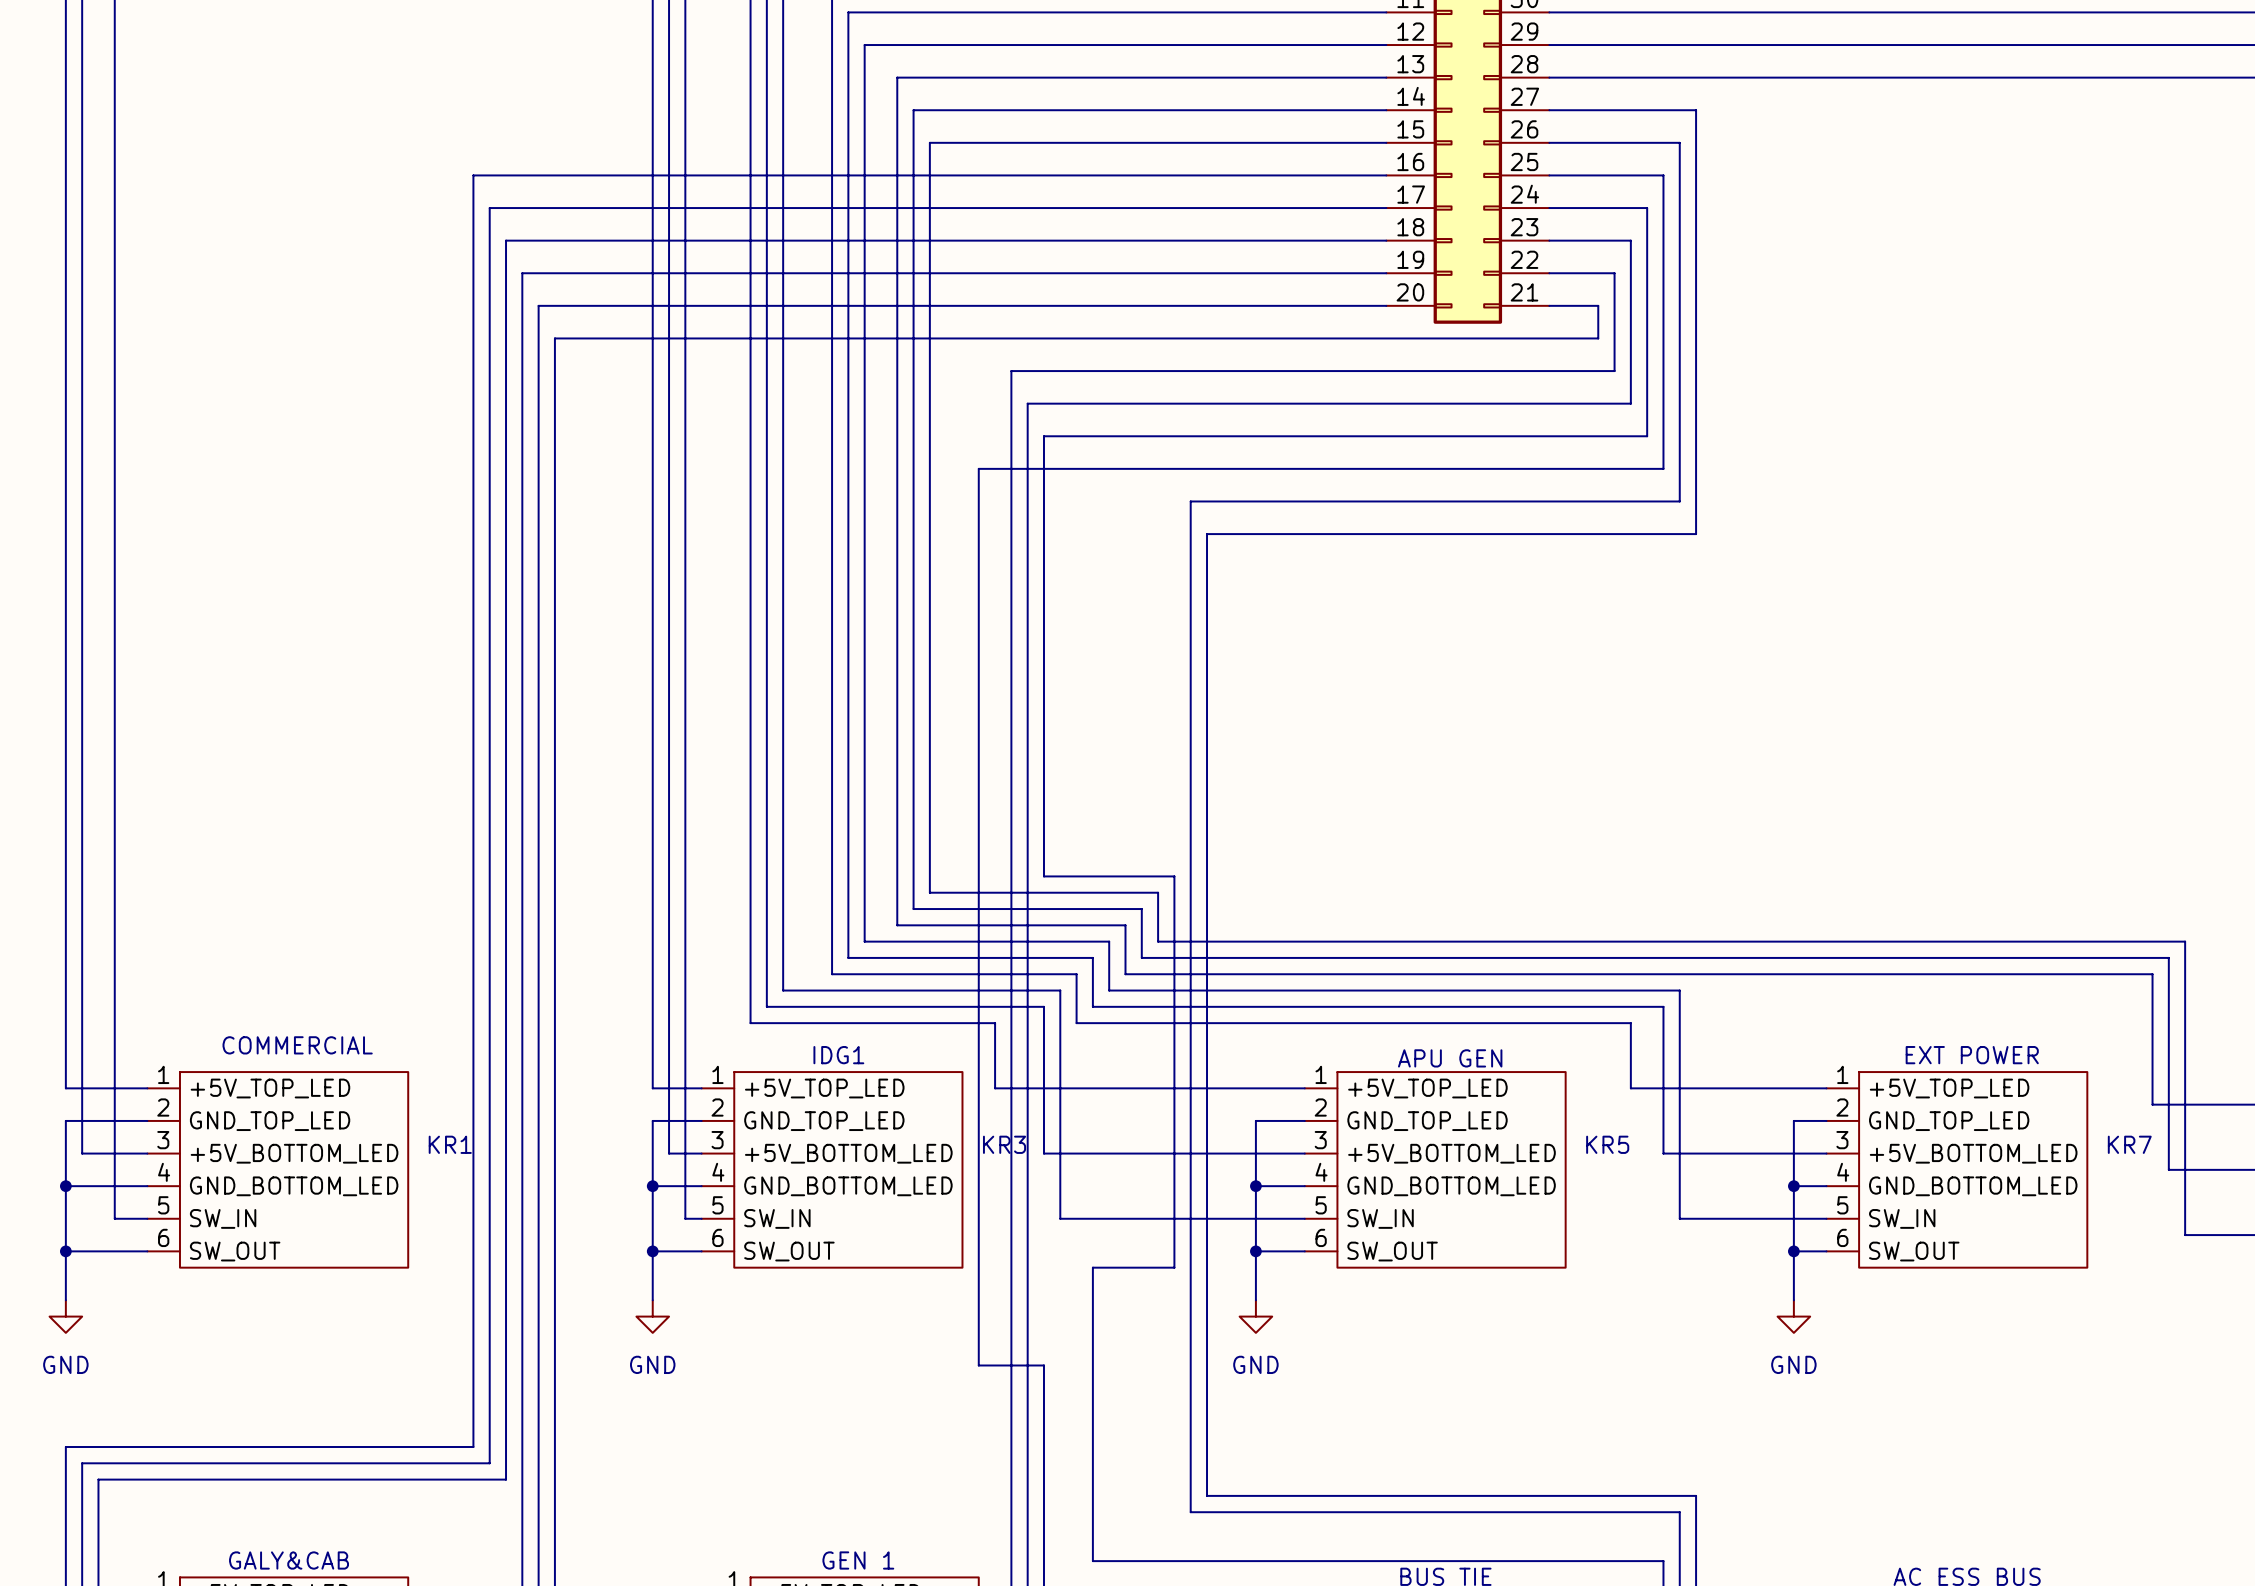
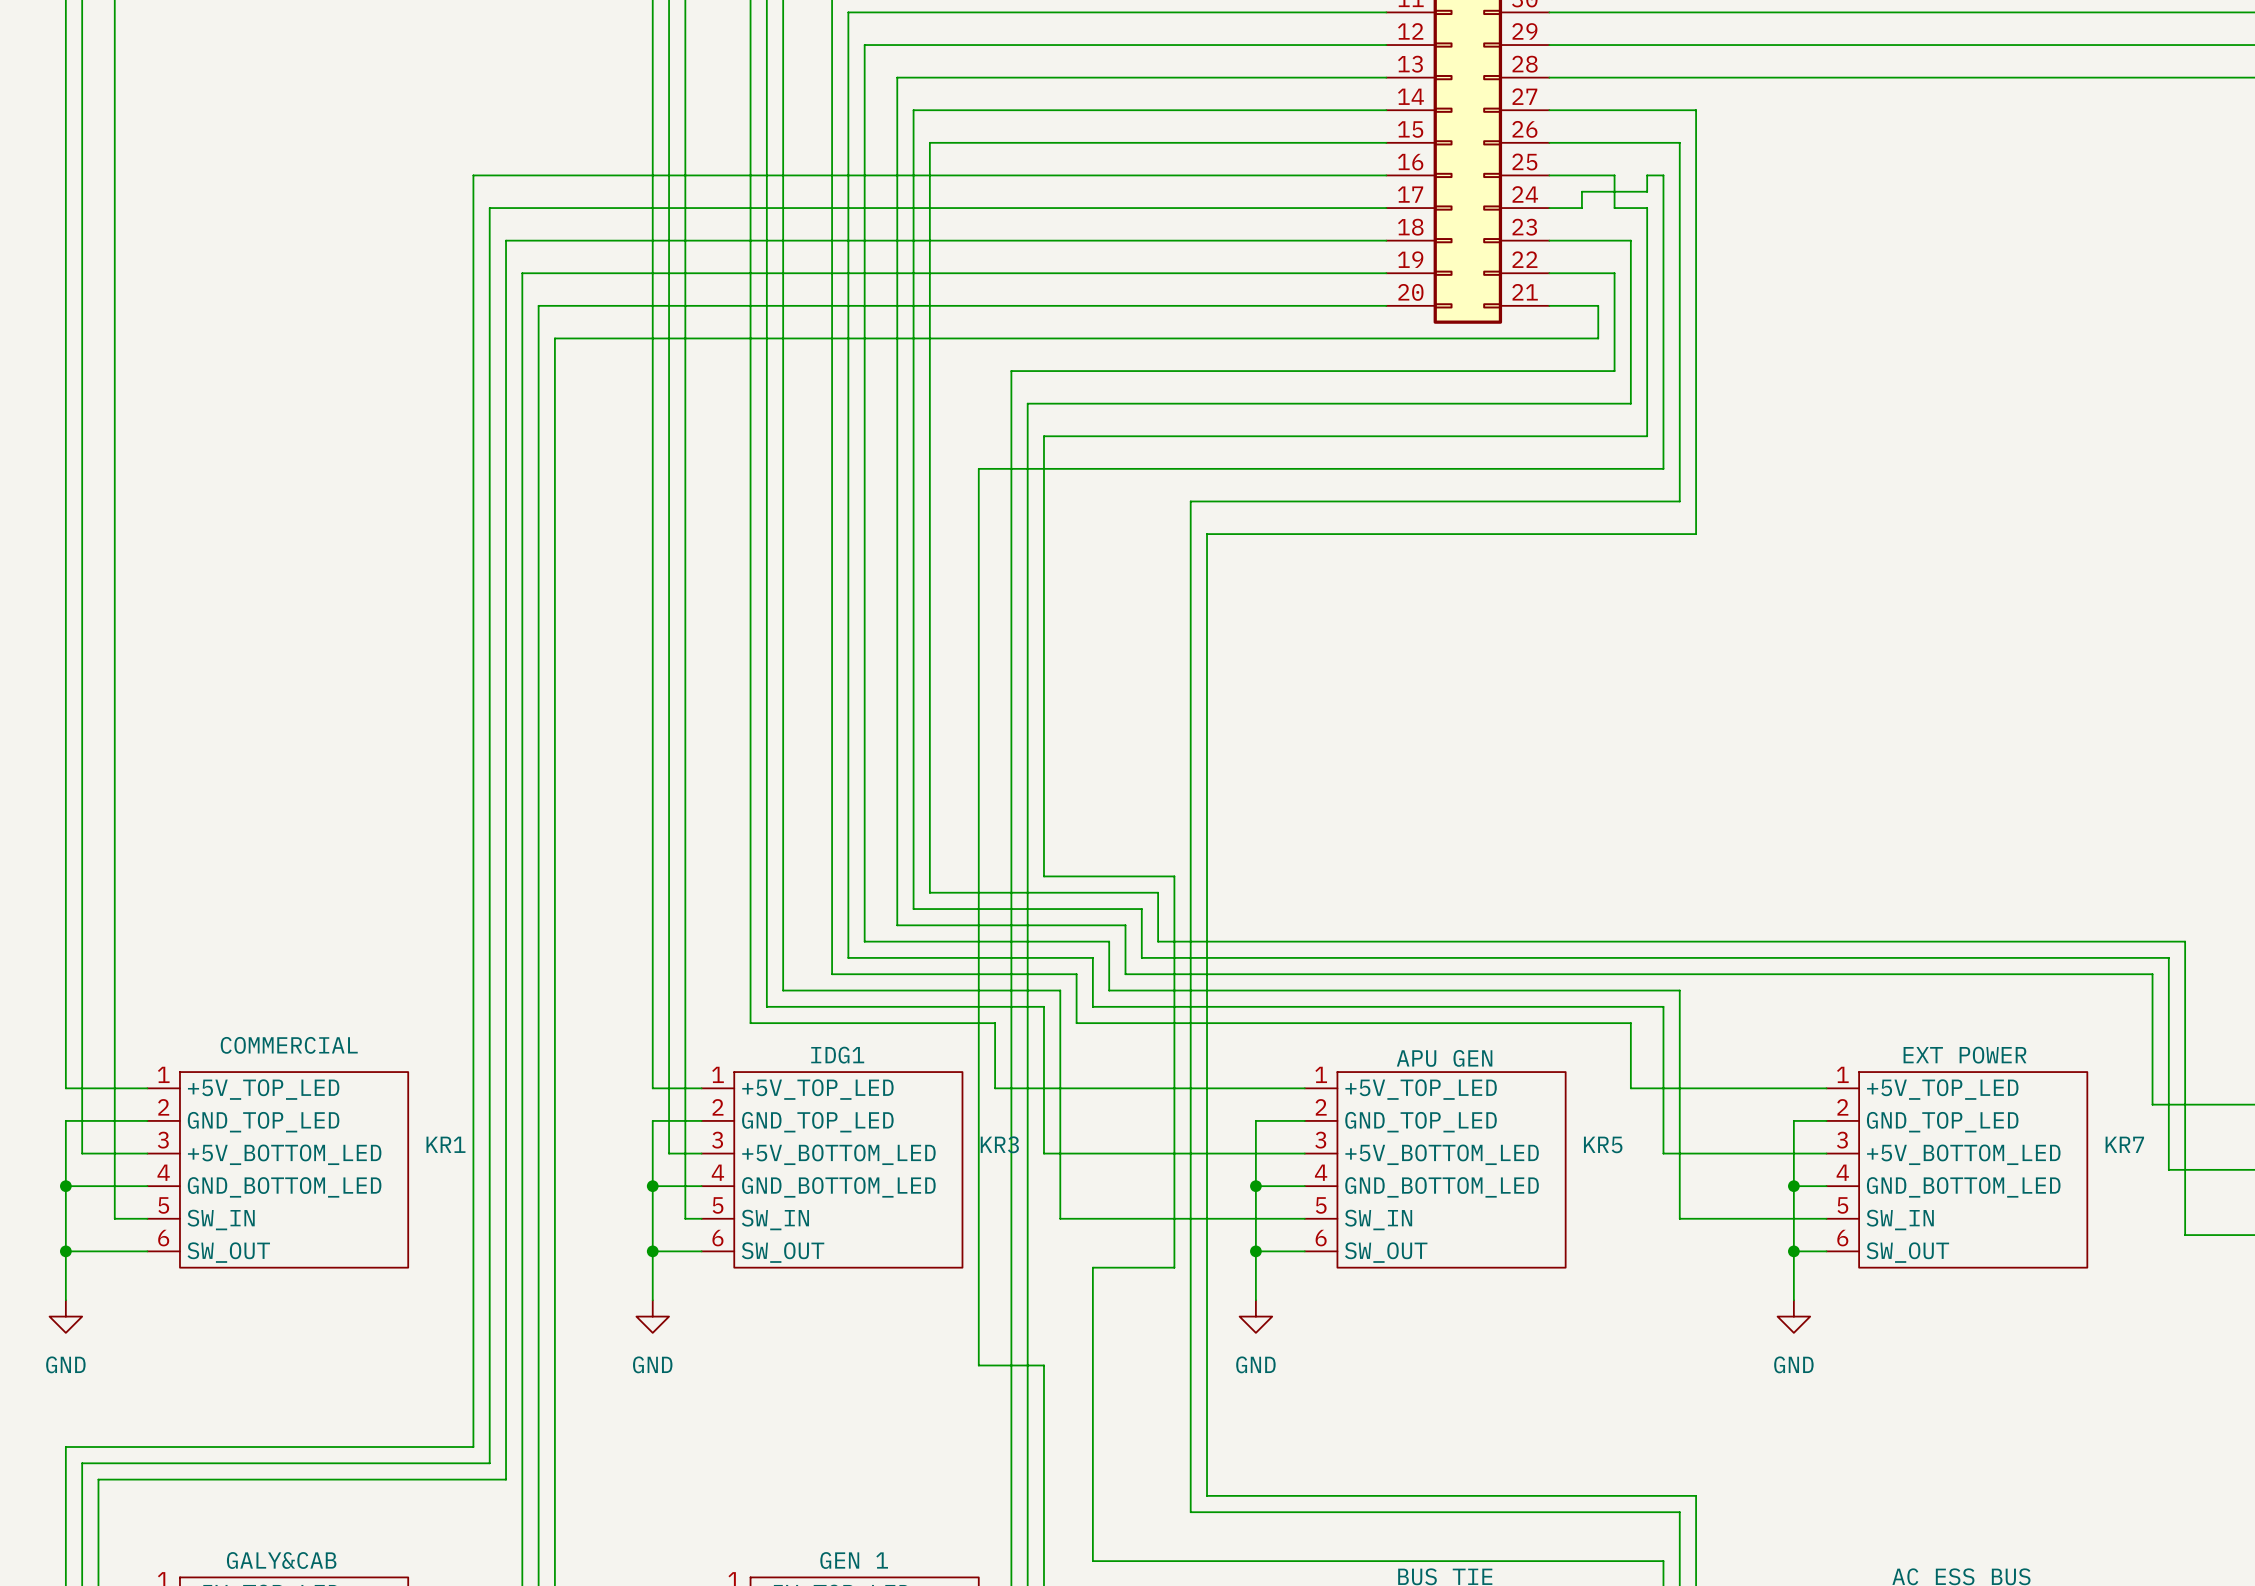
wire: (1614, 175) (1647, 175) -> (1581, 208) (1581, 191) (1647, 191) (1647, 175)
wire: (1581, 208) (1614, 208) -> (1614, 175) (1614, 208)

